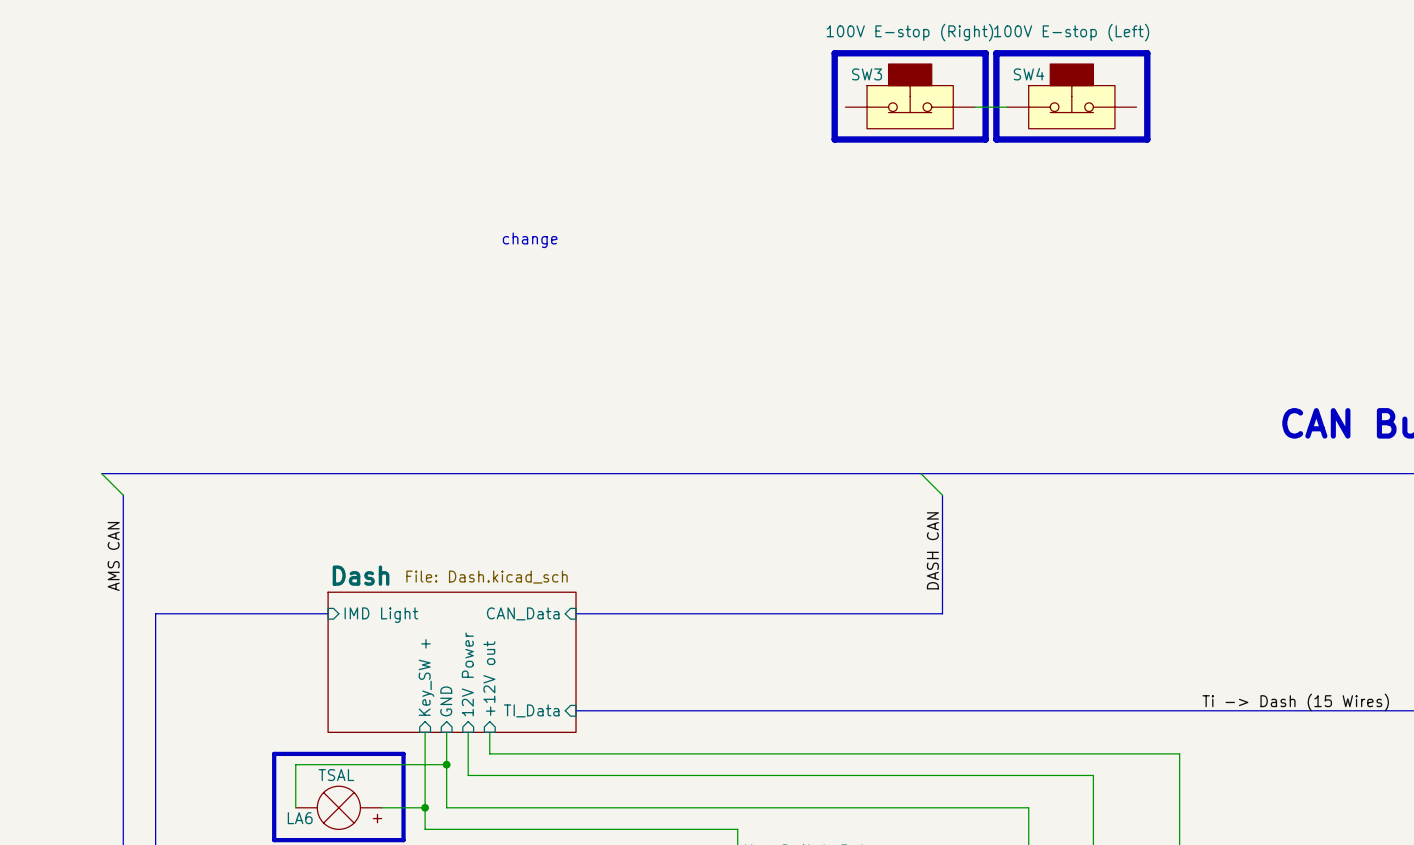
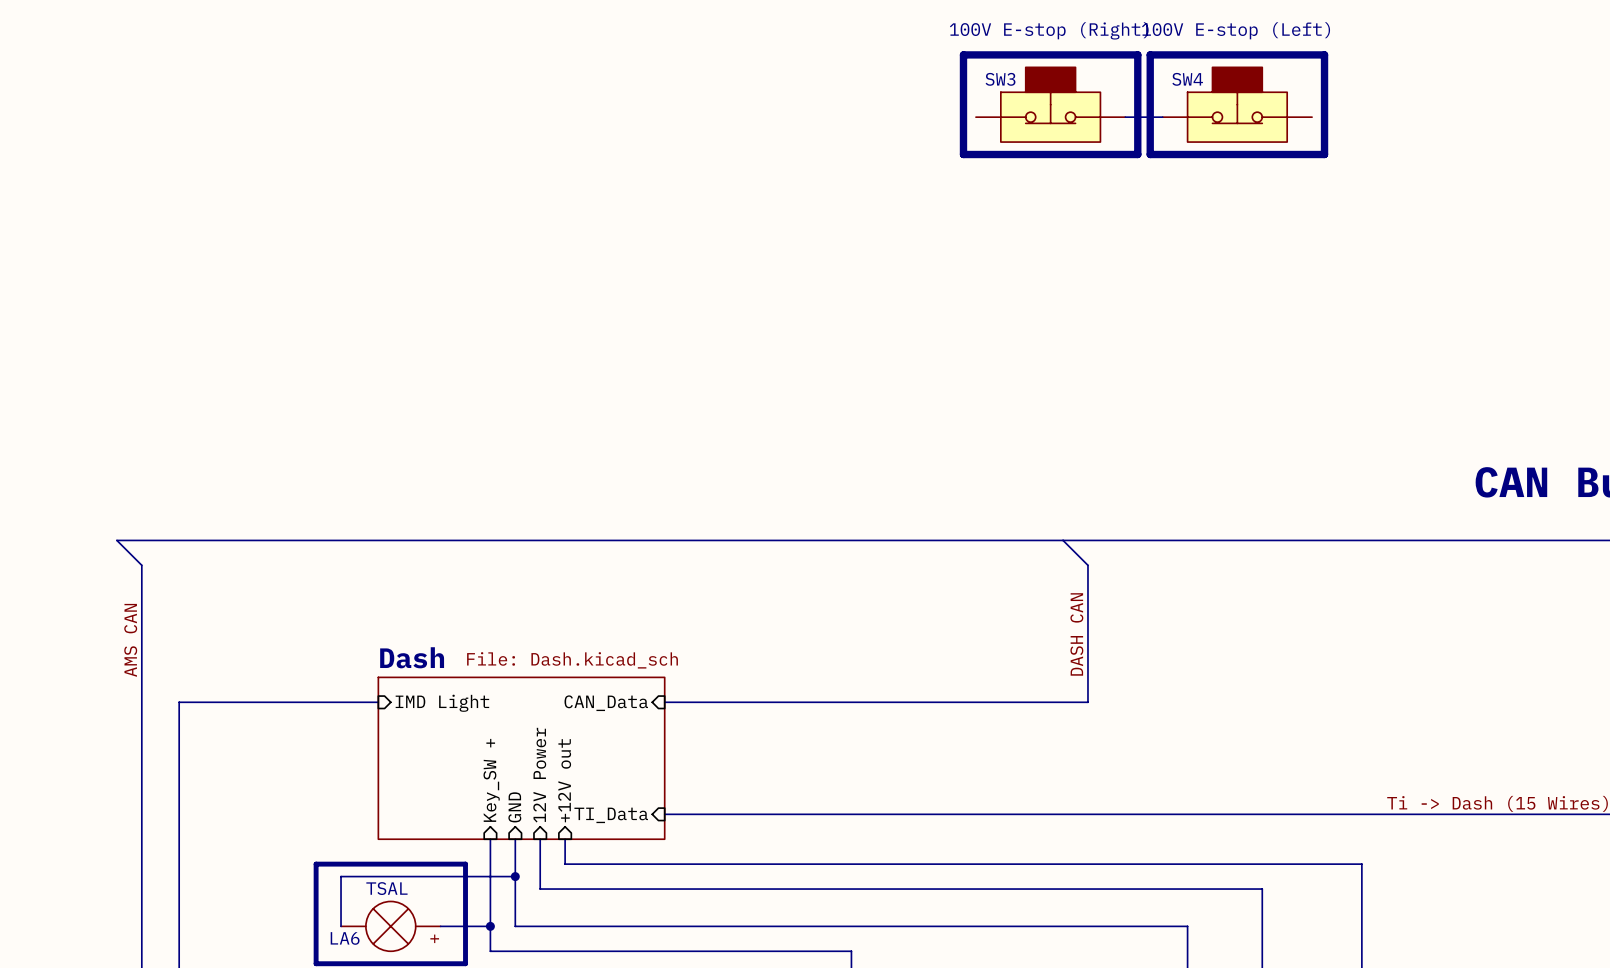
text: change (530, 240) -> none

